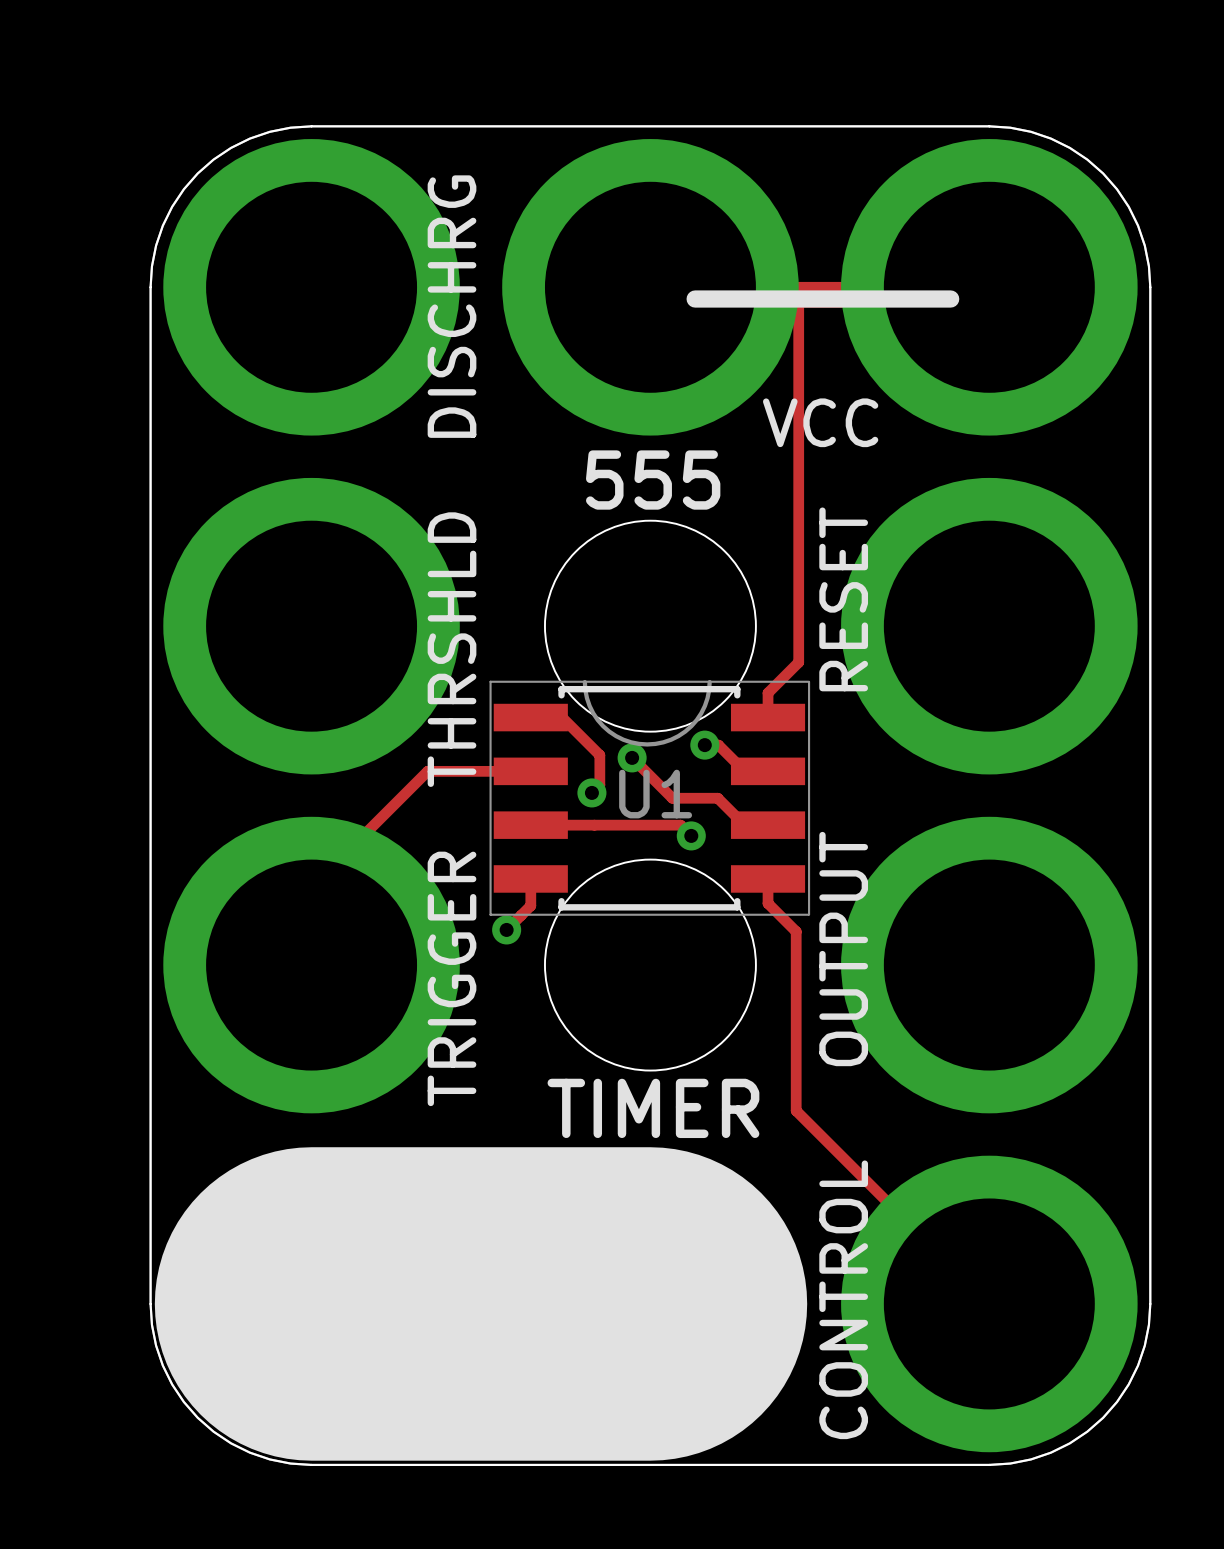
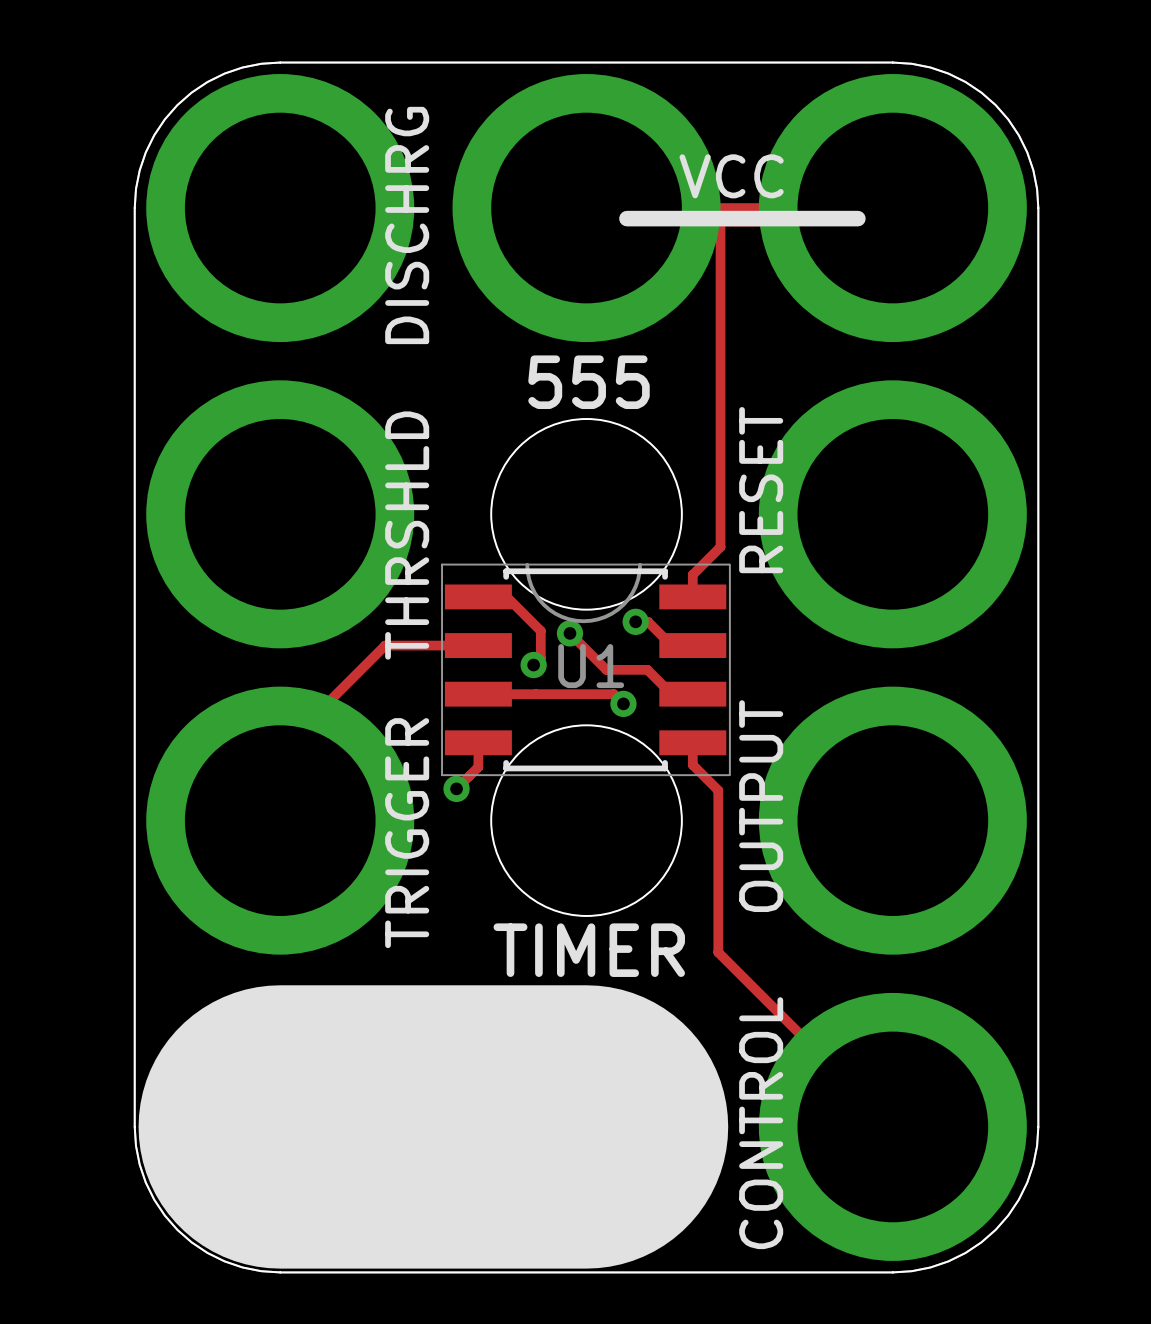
U1 text position: VCC (820, 422) -> VCC (731, 176)

